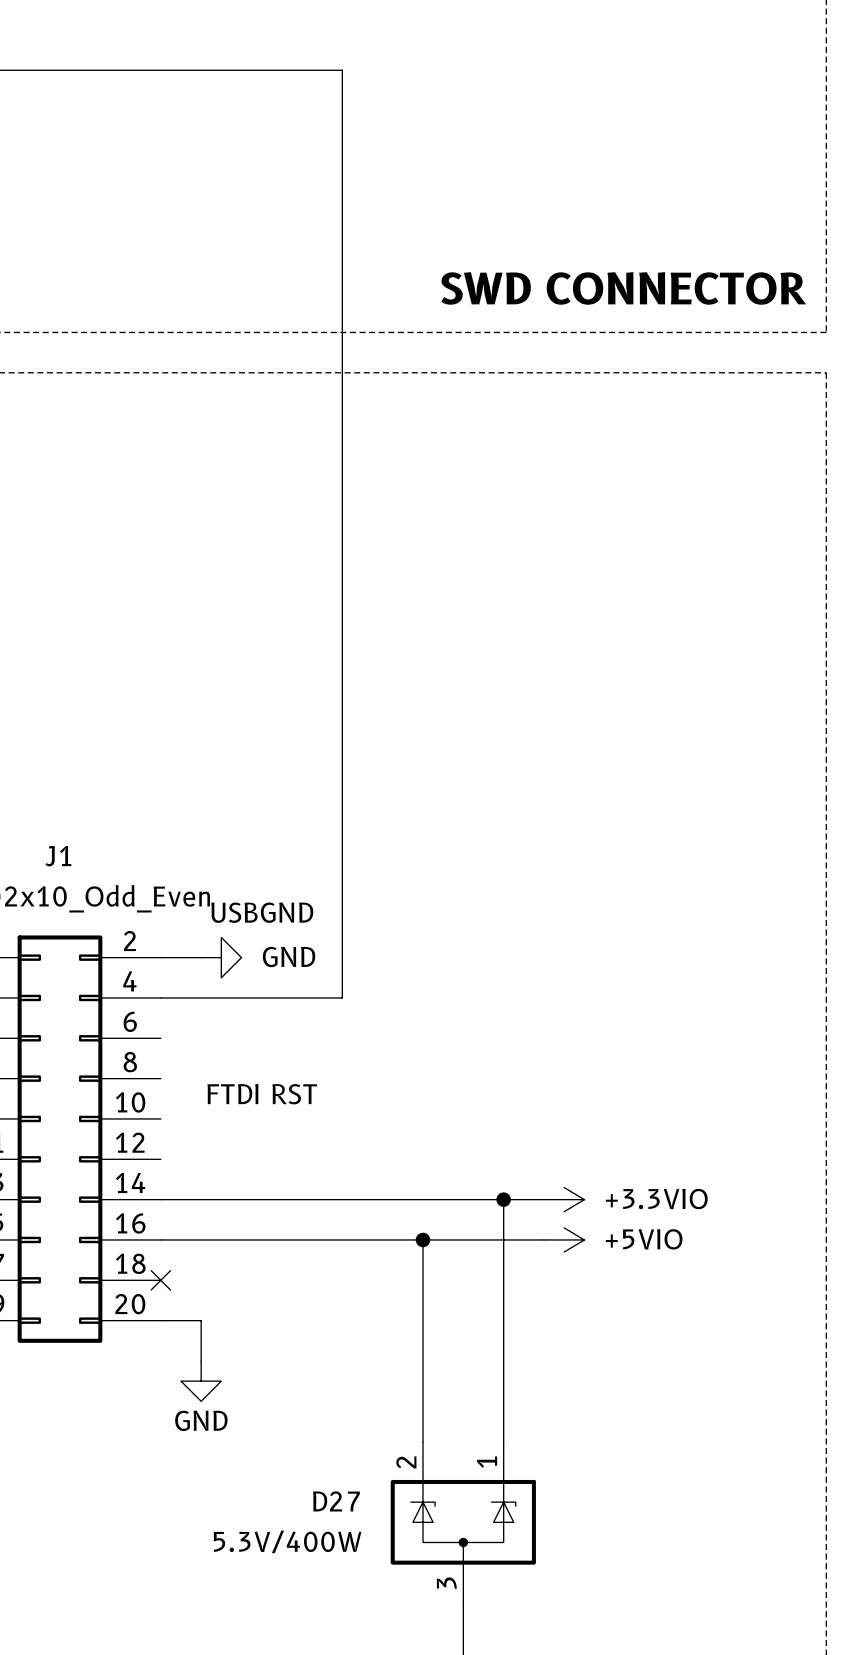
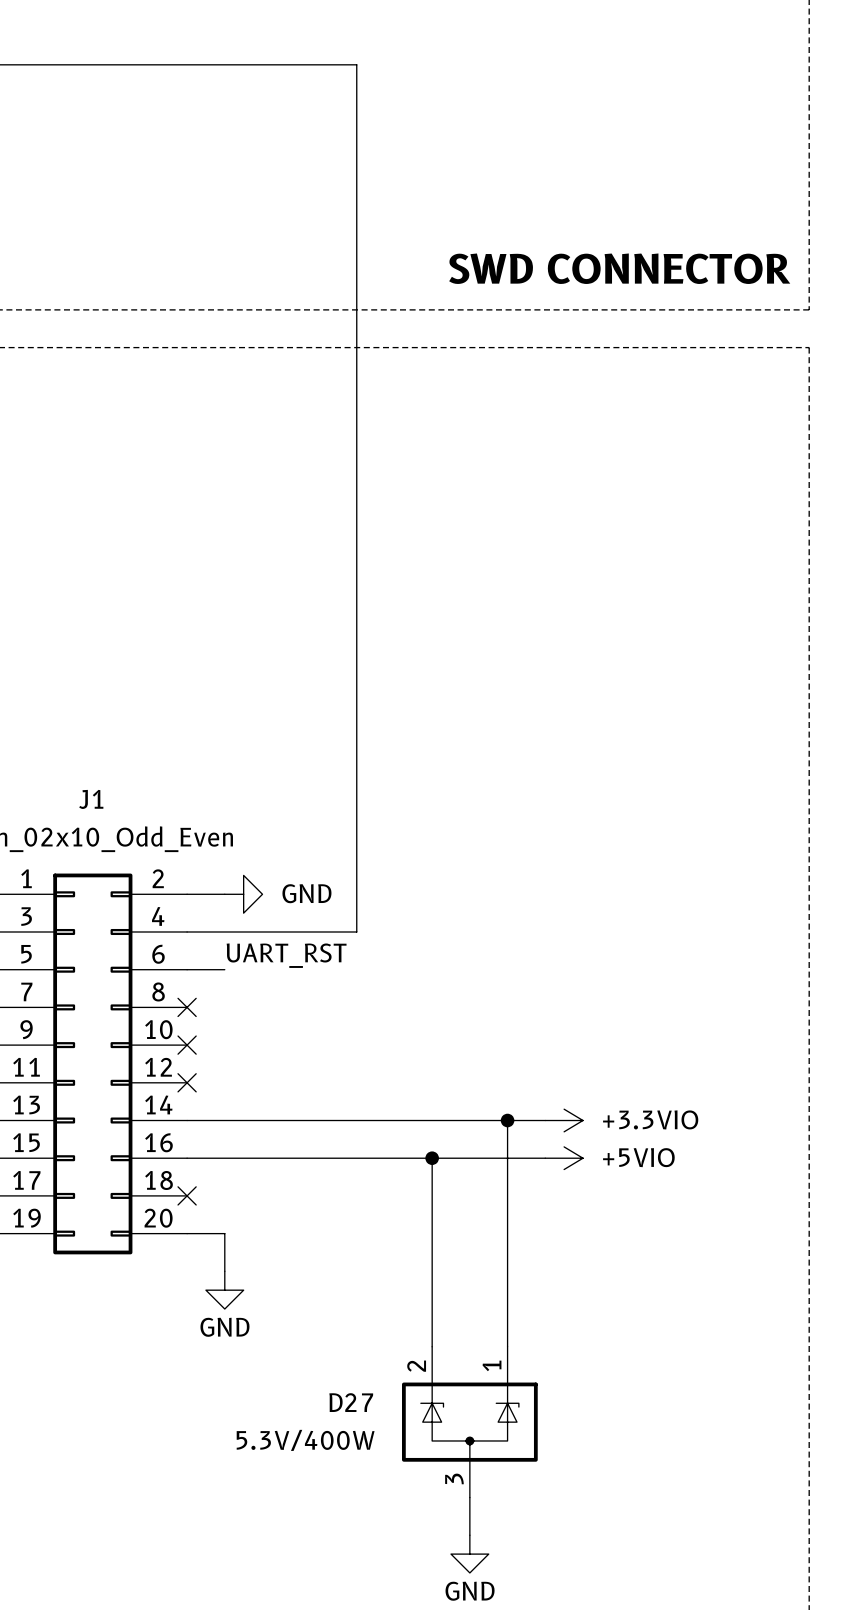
text: USBGND (262, 912) -> none
label: none -> UART_RST (286, 955)
wire: none -> (187, 969) (224, 969)
no-connect mark: none -> (187, 1007)
text: FTDI RST (262, 1094) -> none
no-connect mark: none -> (187, 1045)
no-connect mark: none -> (187, 1082)

